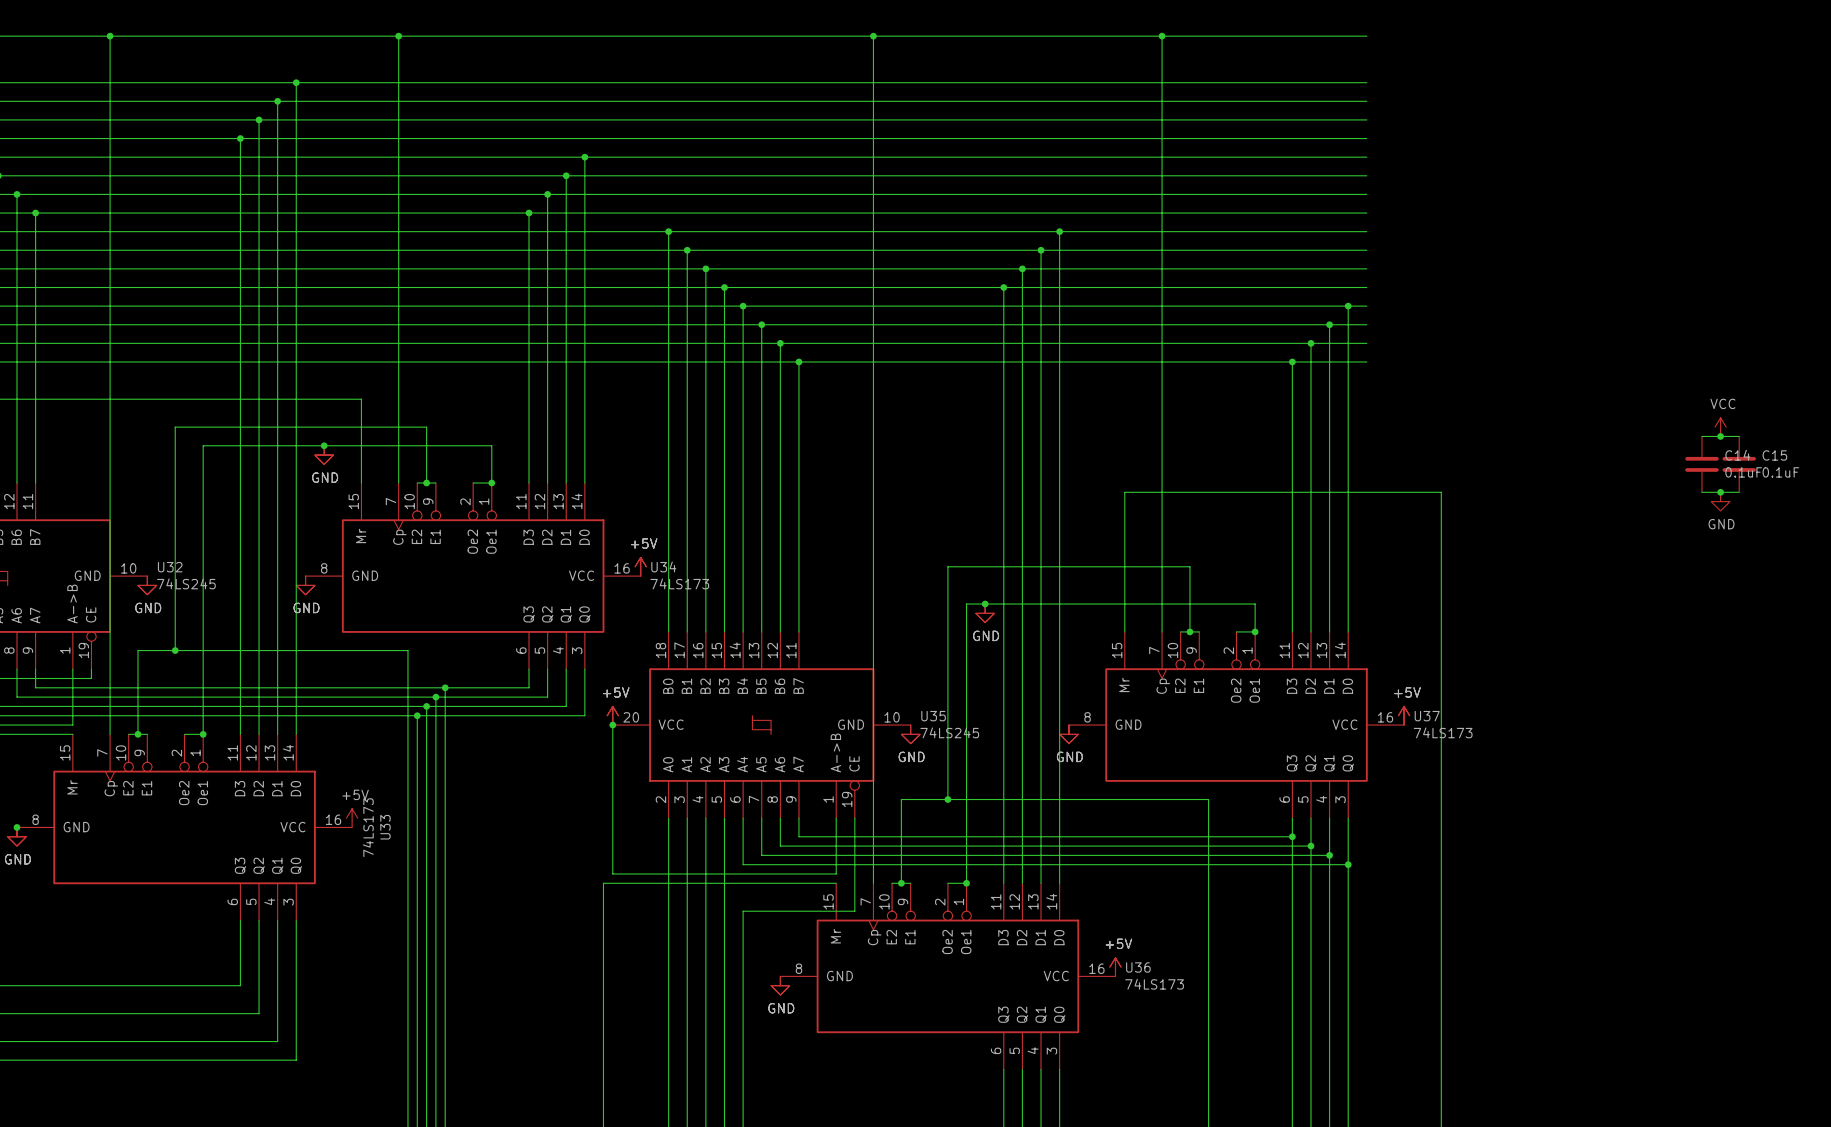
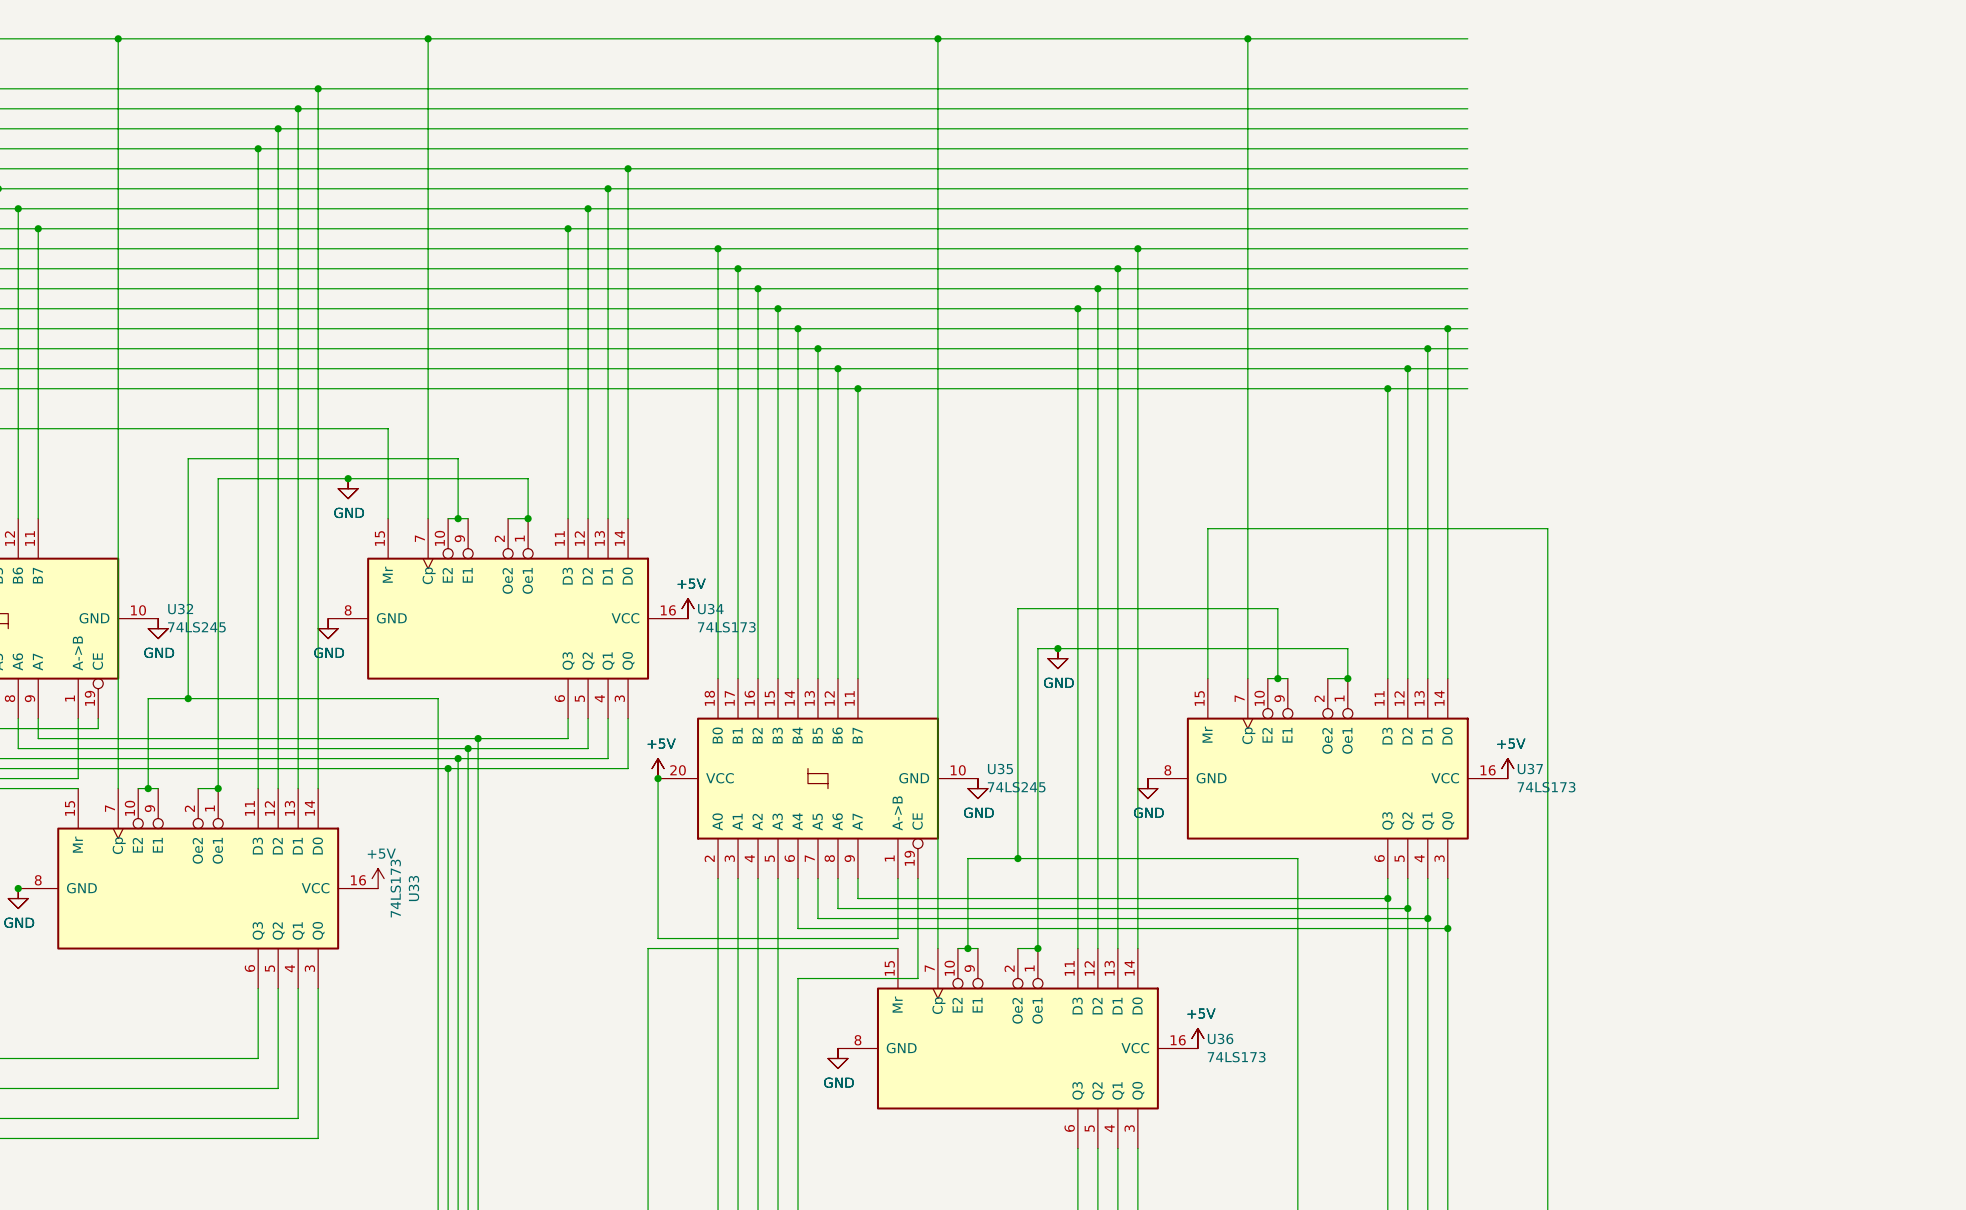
power symbol: VCC (1720, 427) -> none
wire: (1701, 436) (1739, 436) -> none
junction: (1720, 436) -> none
C14: 0.1uF (1701, 464) -> none
C15: 0.1uF (1739, 464) -> none
wire: (1701, 492) (1739, 492) -> none
junction: (1720, 492) -> none
power symbol: GND (1720, 501) -> none

